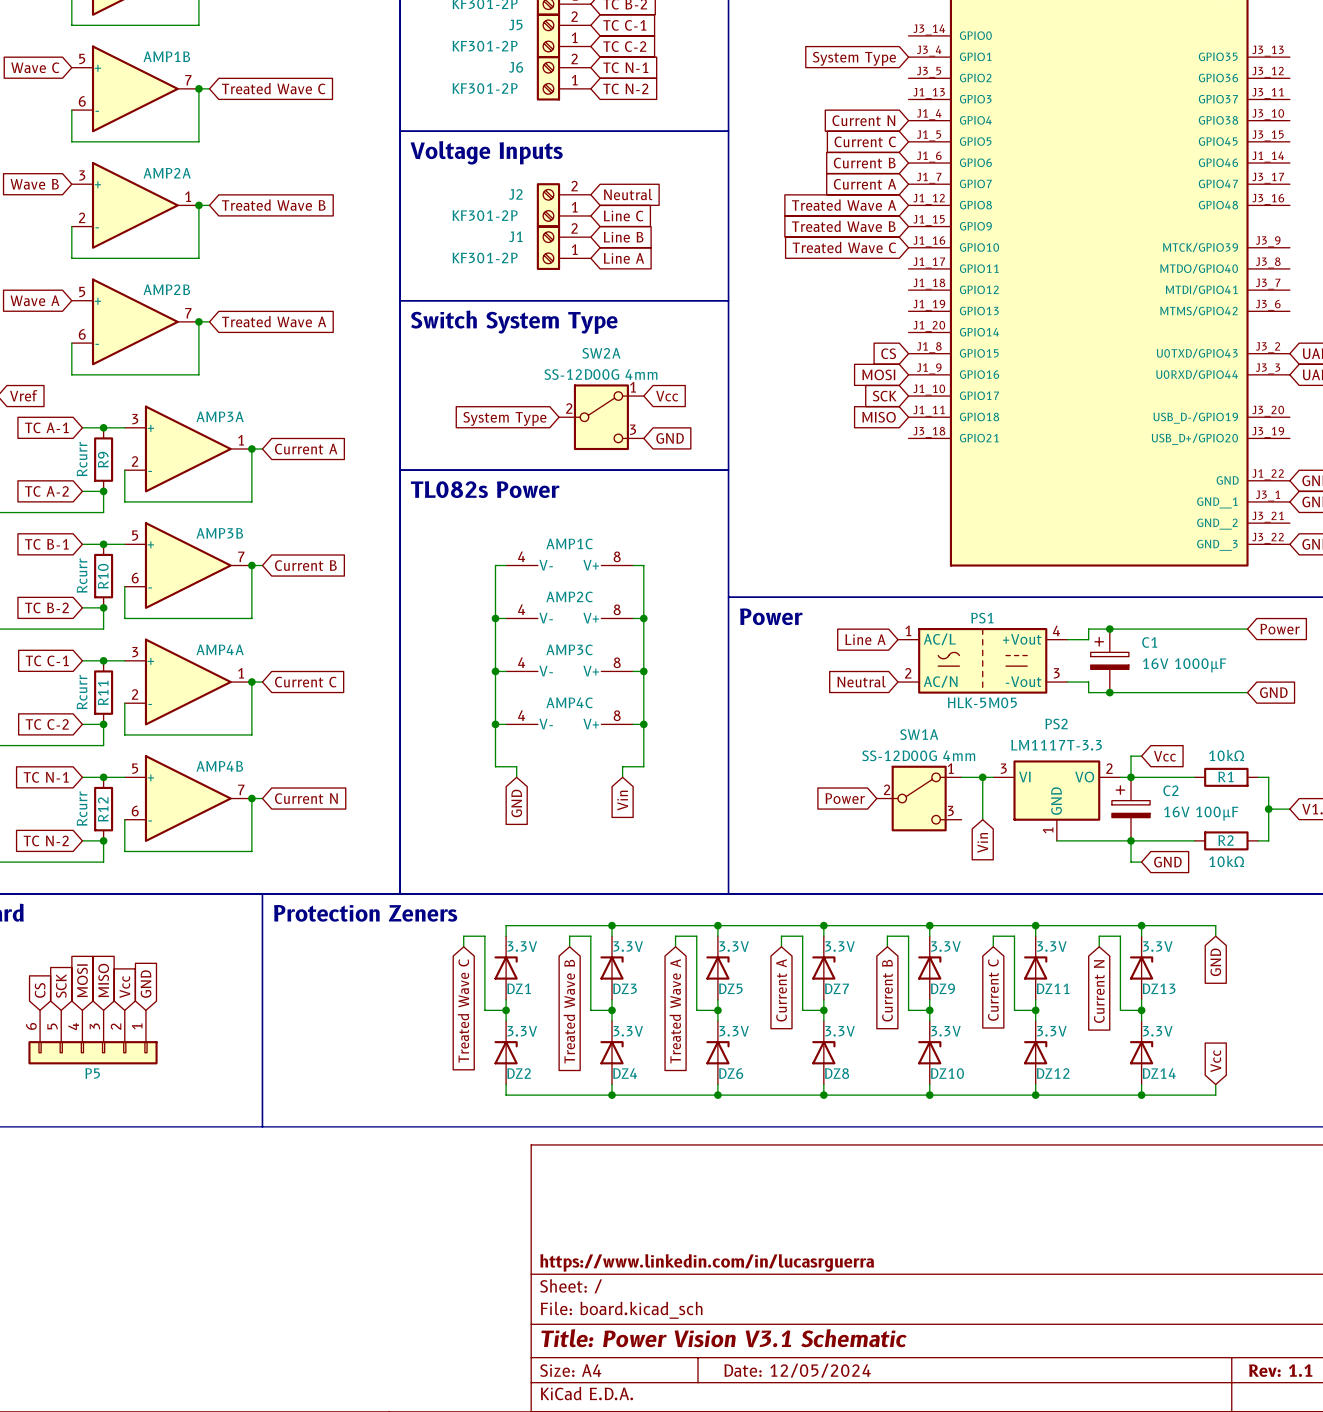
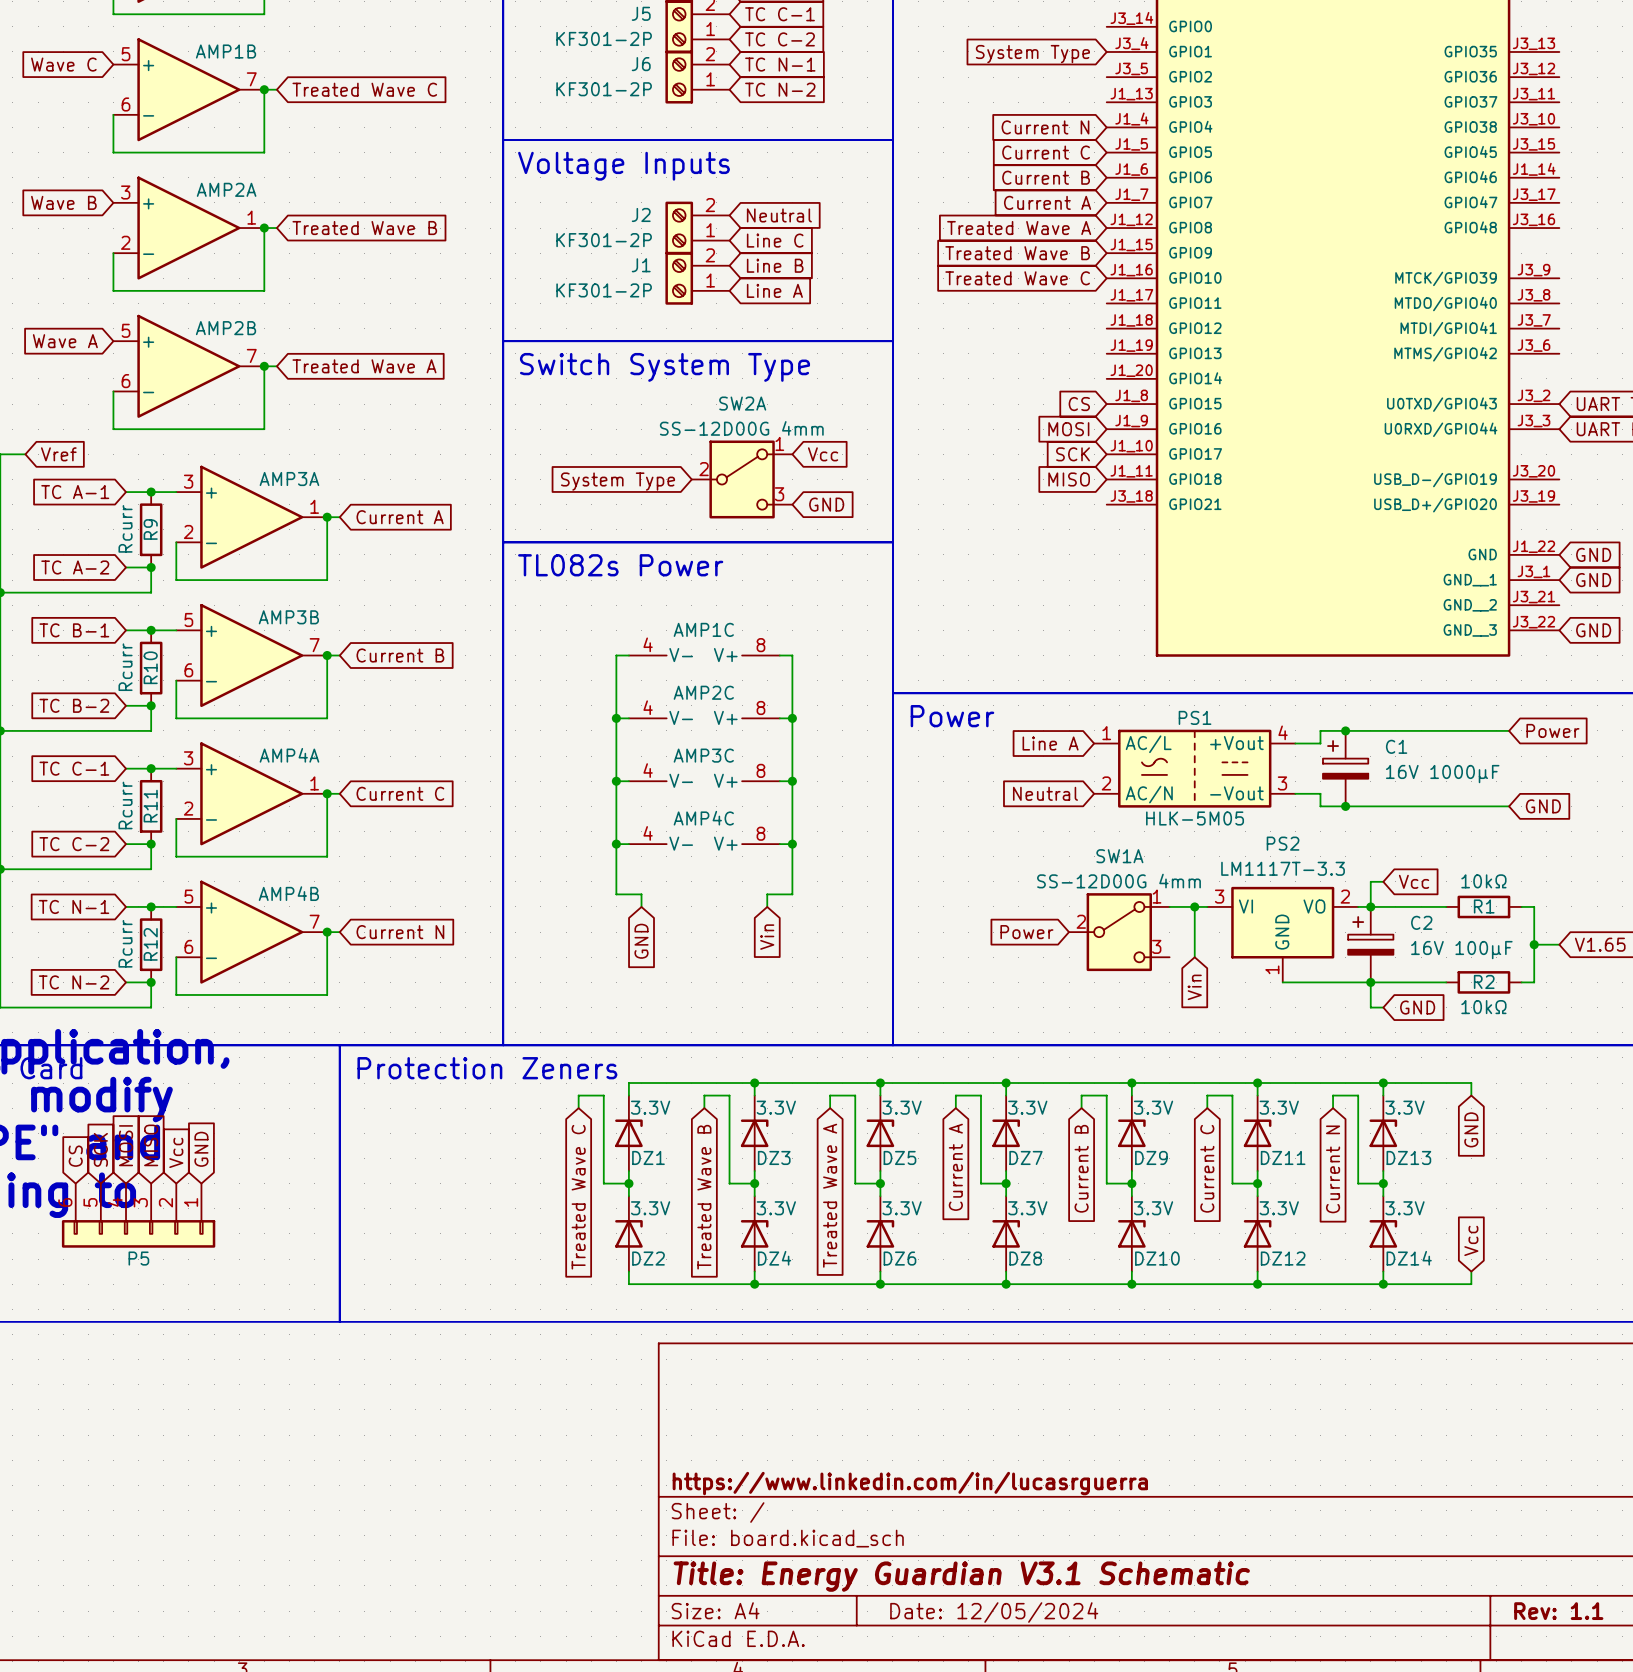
title block: Title: Power Vision V3.1 Schematic (724, 1338) -> Title: Energy Guardian V3.1 Schematic (961, 1576)

